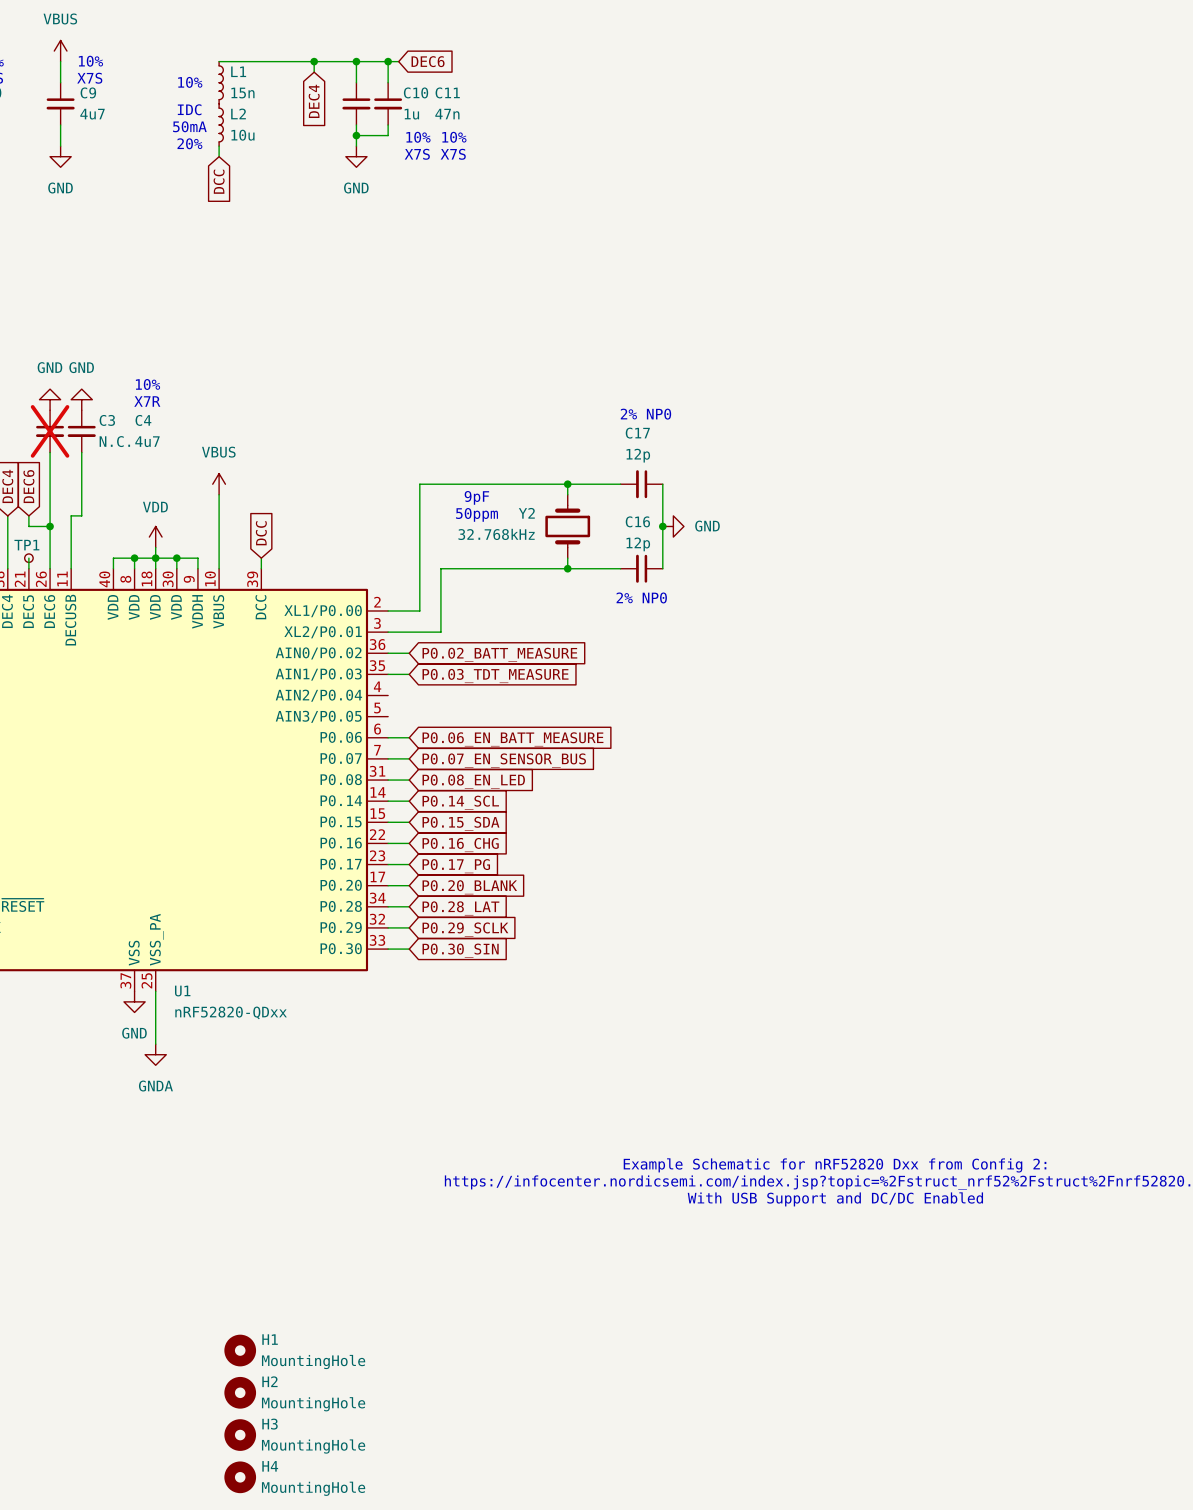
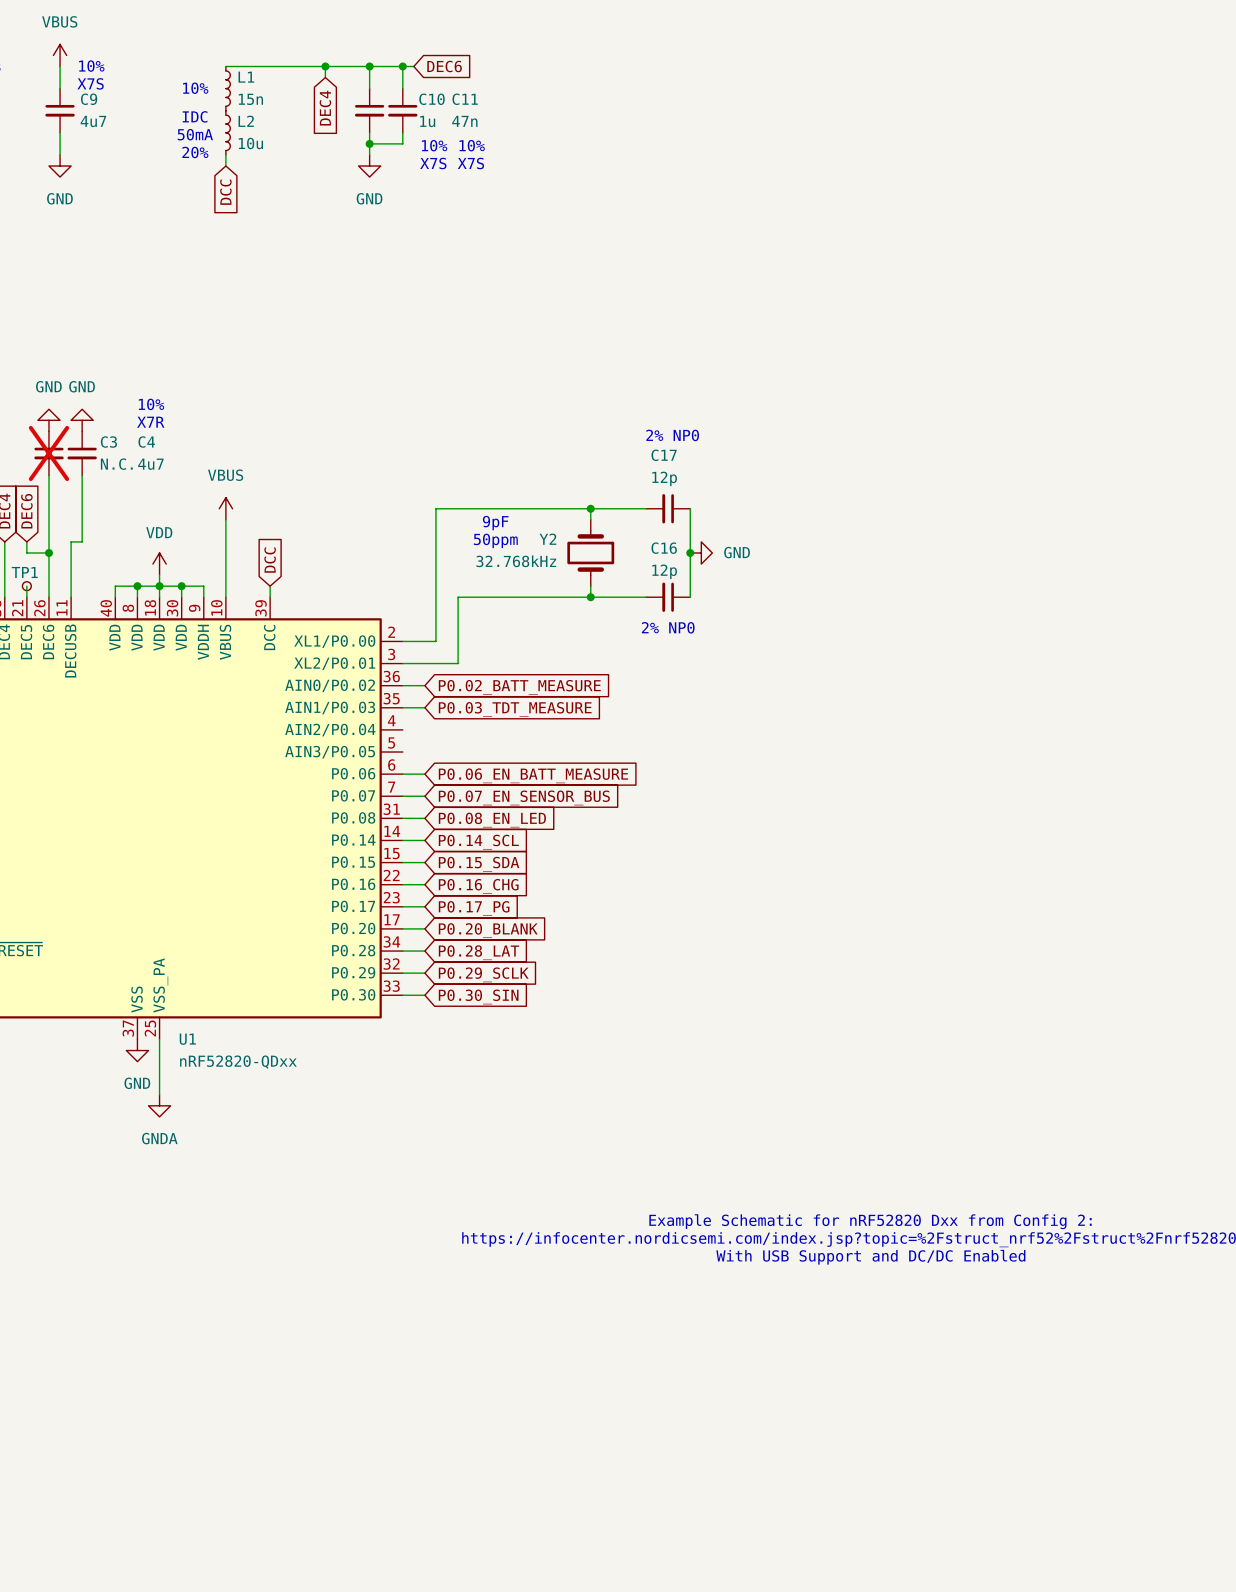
H1: MountingHole (240, 1350) -> none
H2: MountingHole (240, 1392) -> none
H3: MountingHole (240, 1435) -> none
H4: MountingHole (240, 1477) -> none

